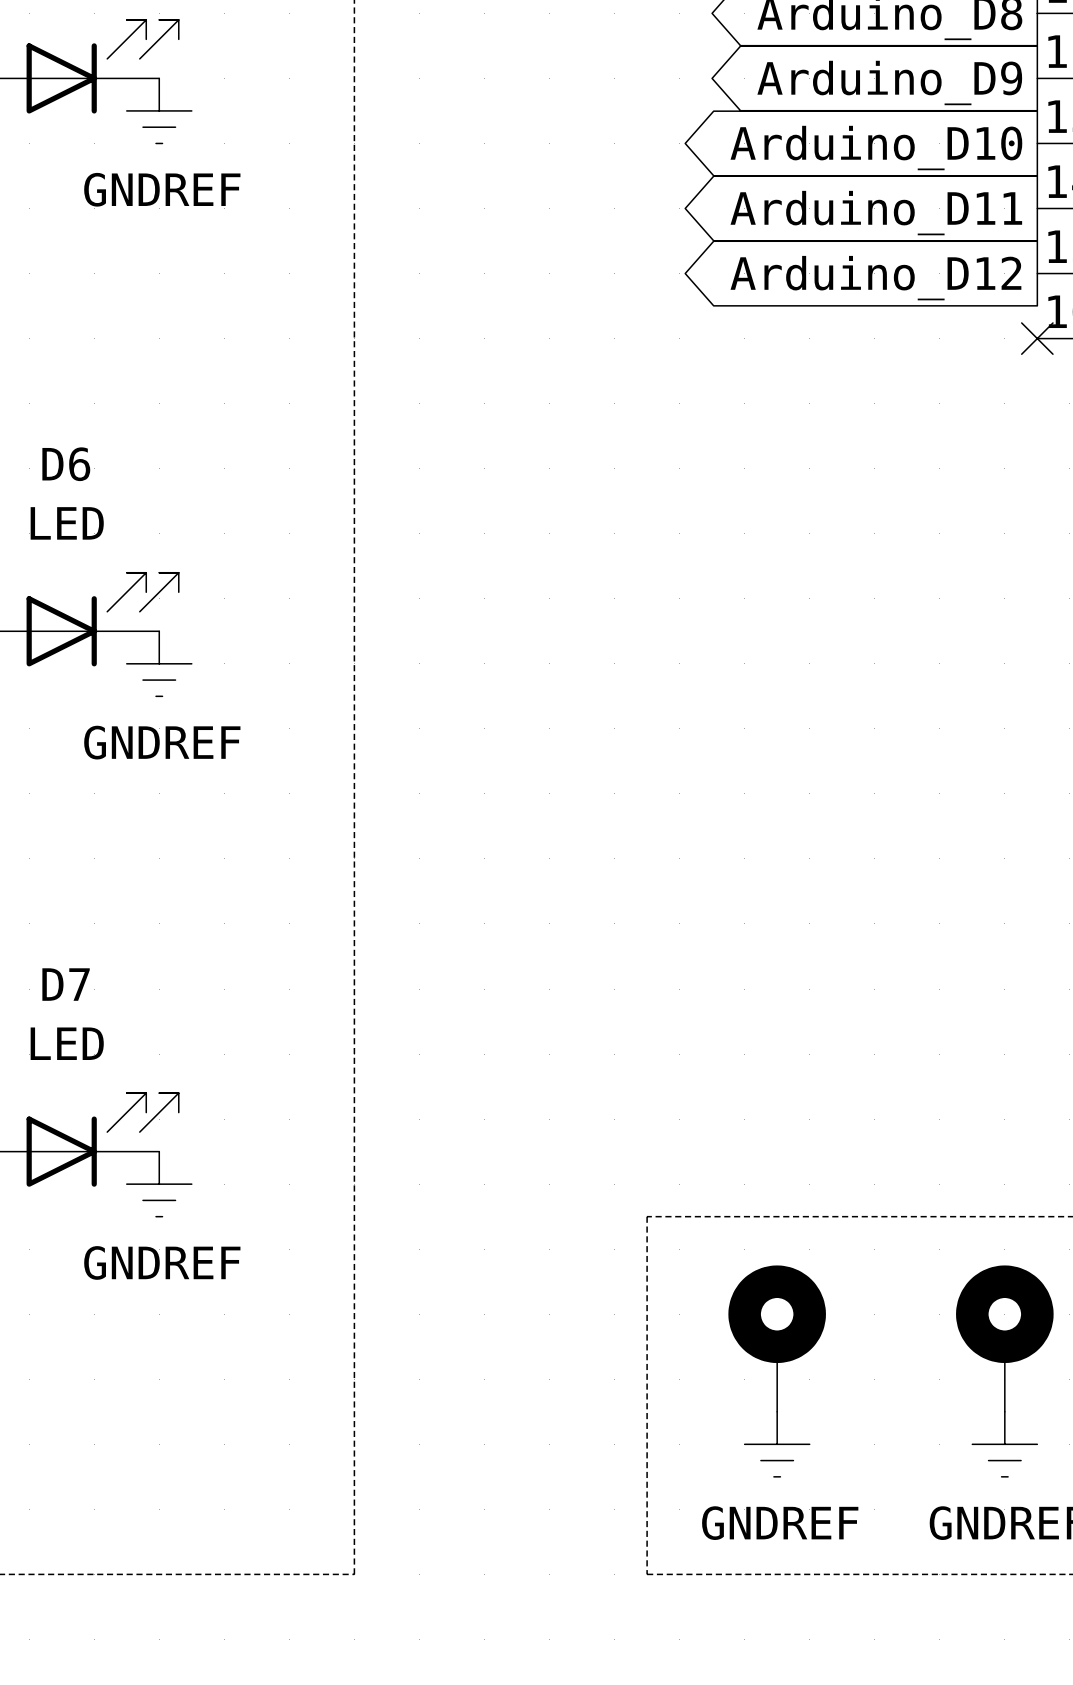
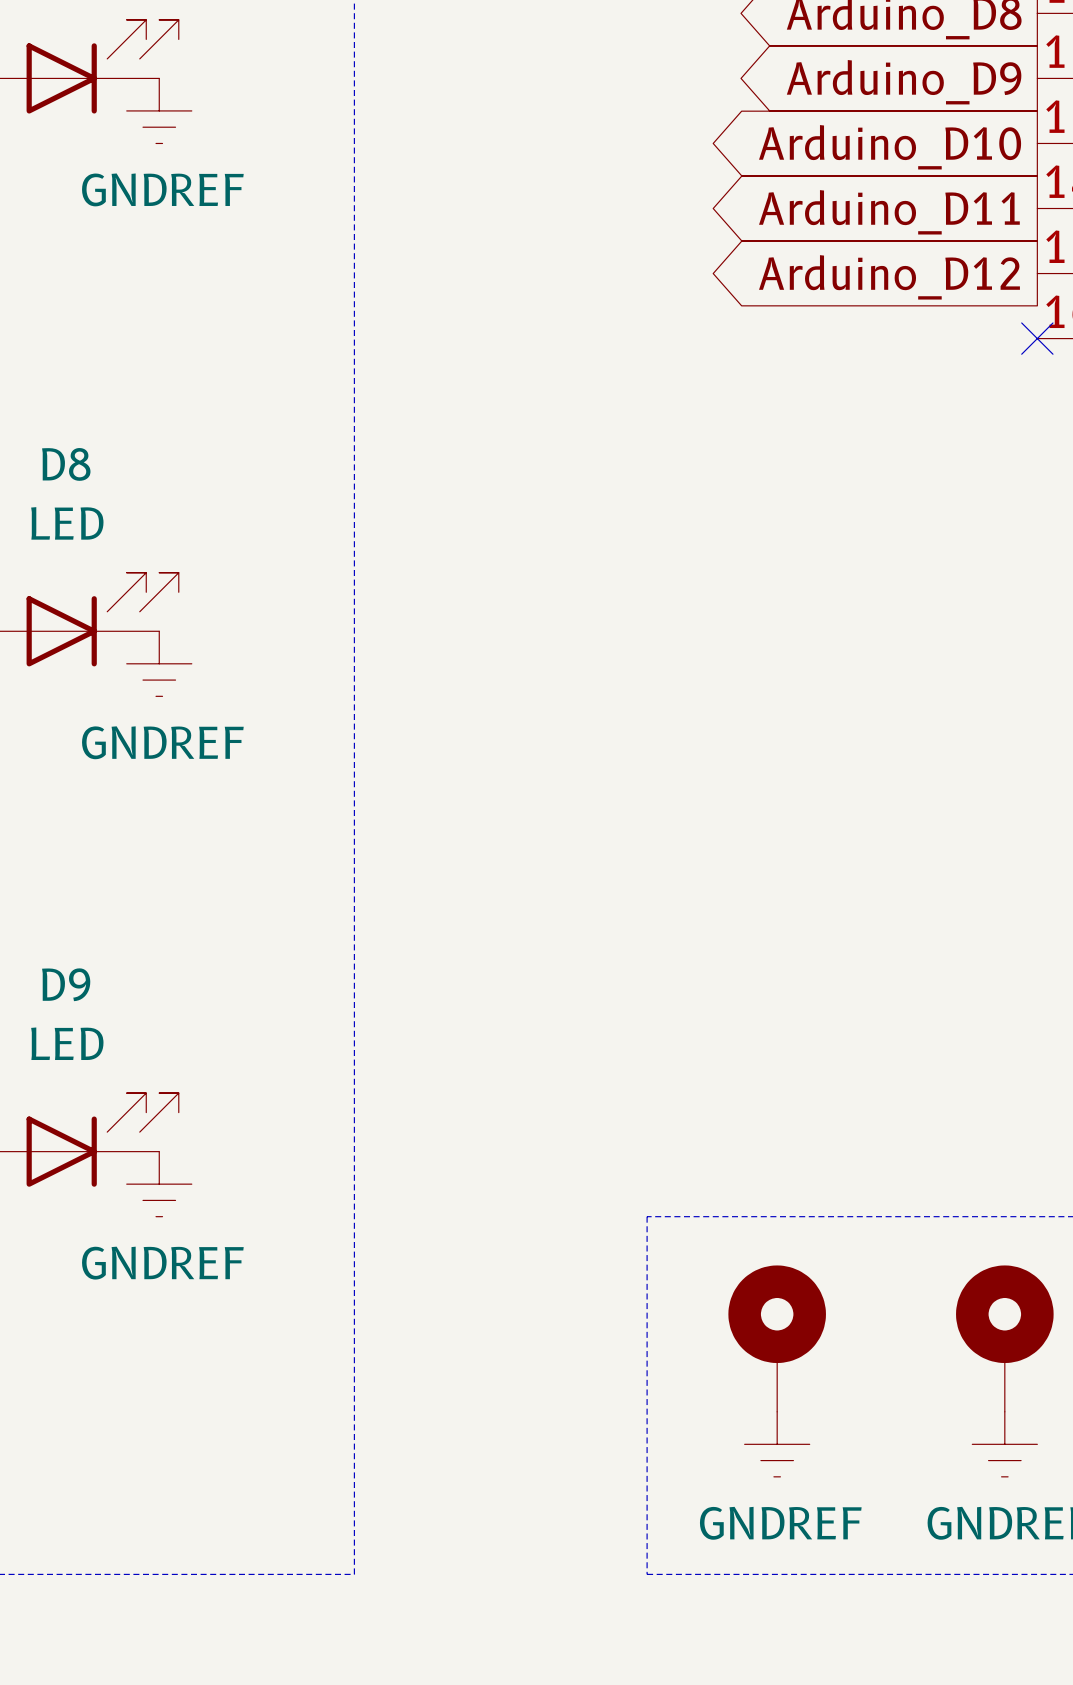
D6 name: D6 (66, 464) -> D8 (66, 464)
D7 name: D7 (66, 984) -> D9 (66, 984)

